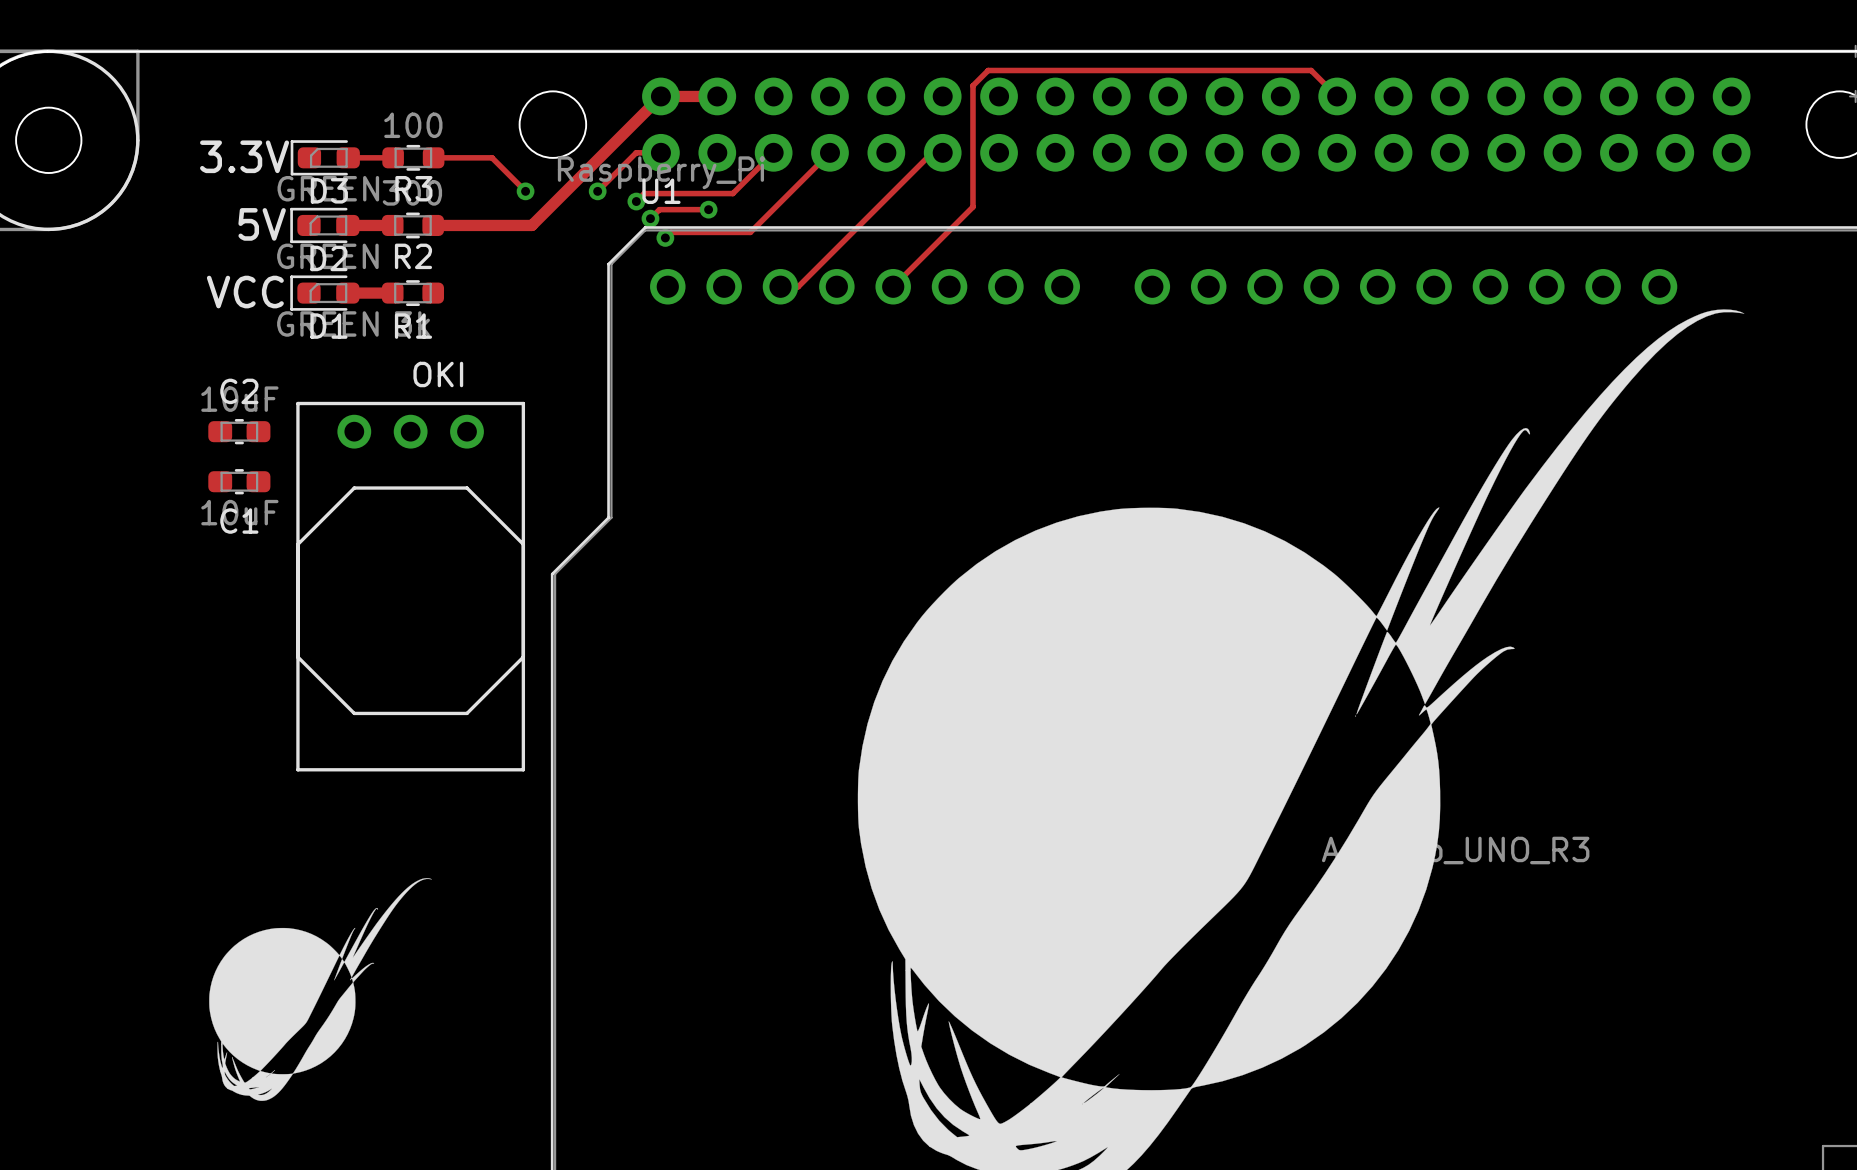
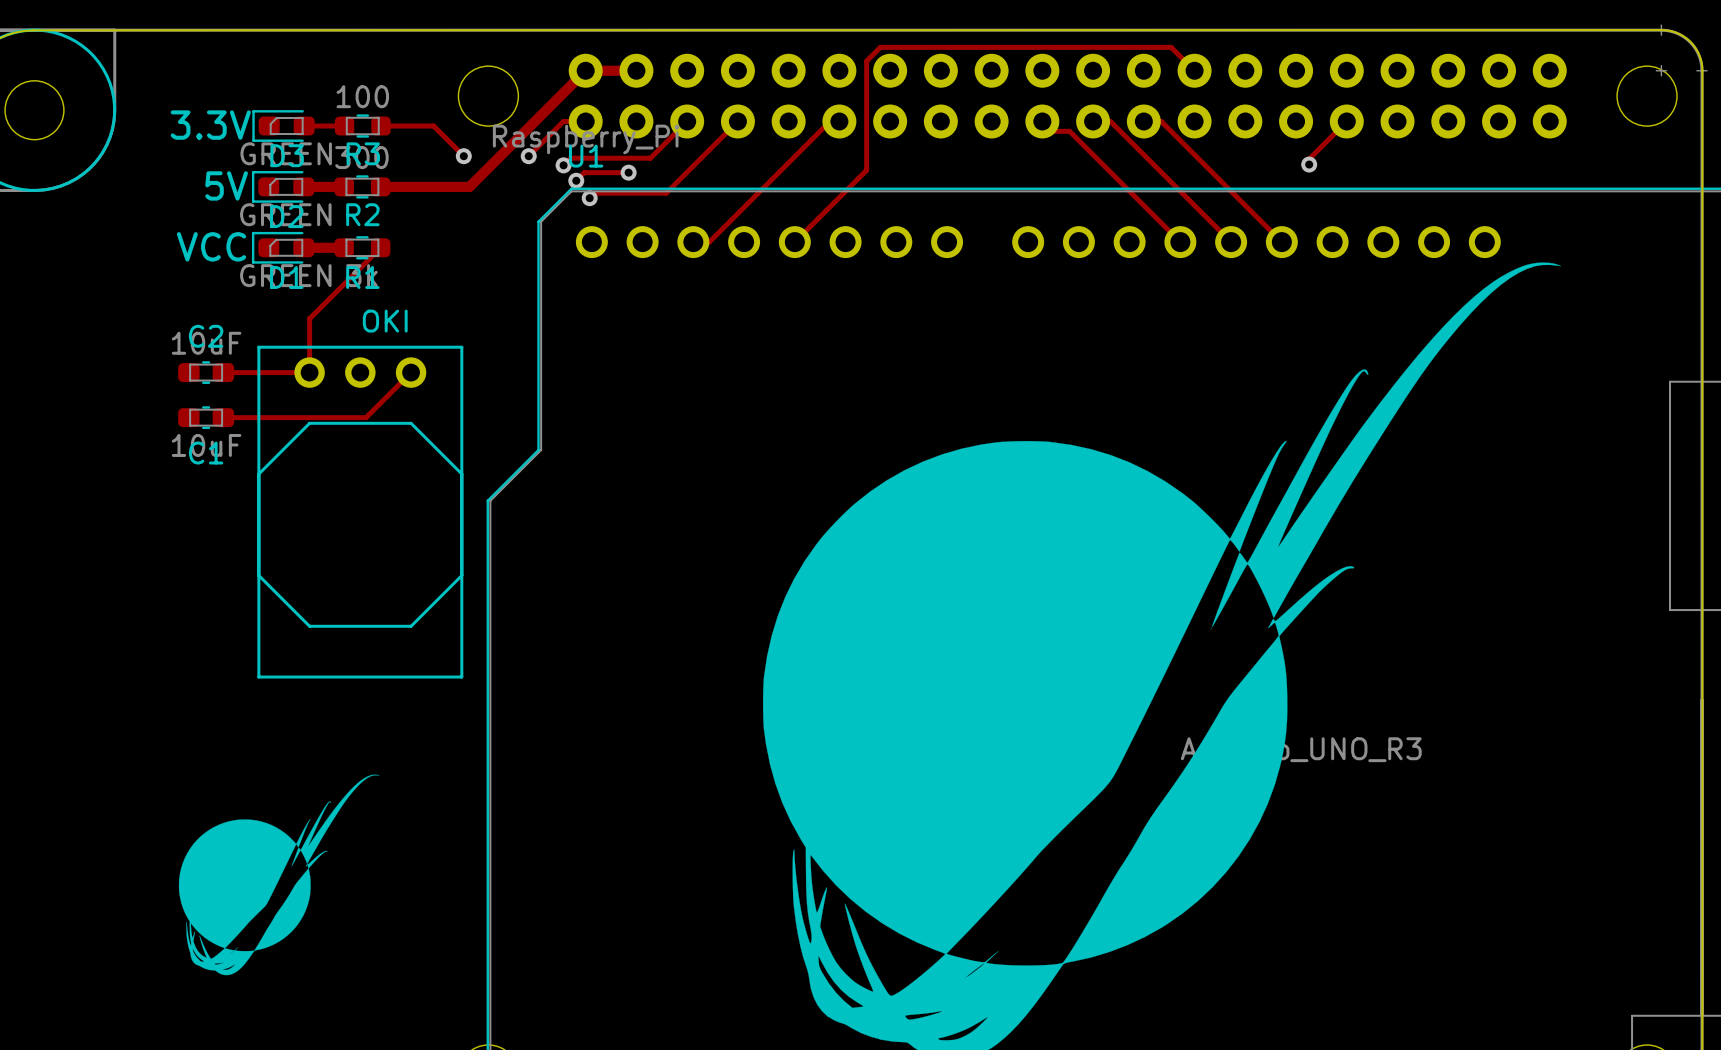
track: none -> (1042, 121) (1052, 131) (1069, 131) (1180, 242)
track: none -> (1093, 121) (1110, 121) (1231, 242)
track: none -> (1143, 121) (1161, 121) (1281, 242)
track: none -> (1346, 121) (1309, 159) (1309, 164)
via: none -> (1309, 164)
track: none -> (380, 247) (309, 318) (309, 372) (223, 372)
track: none -> (411, 372) (366, 417) (223, 417)

